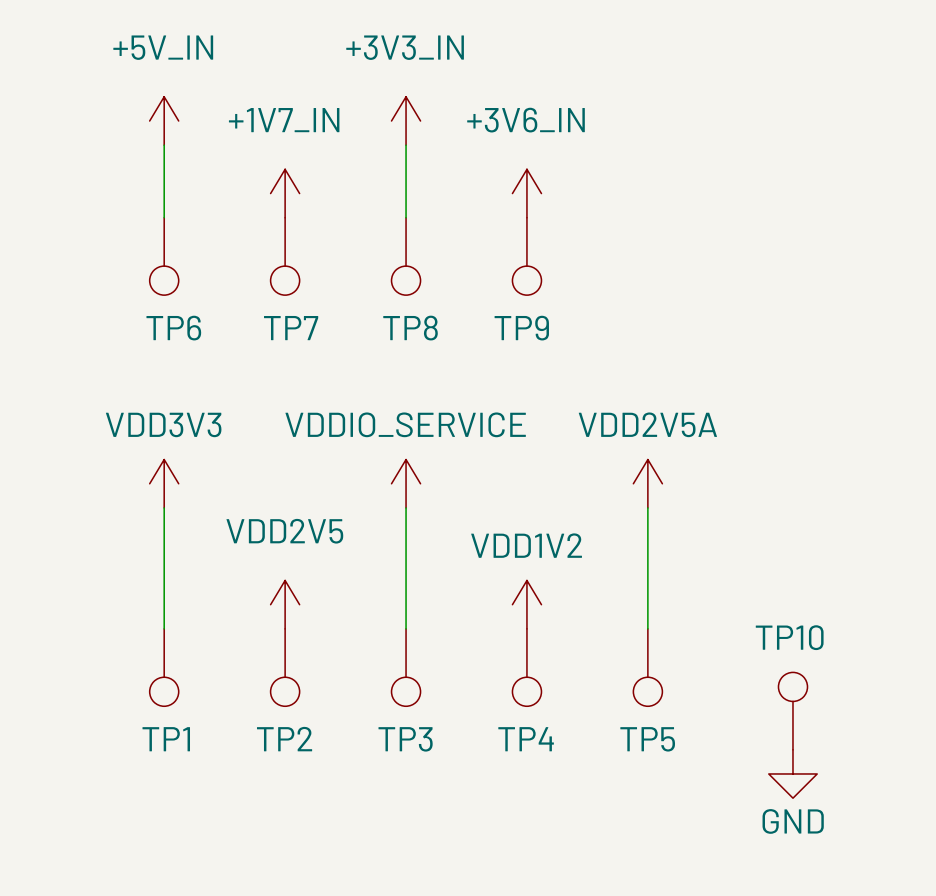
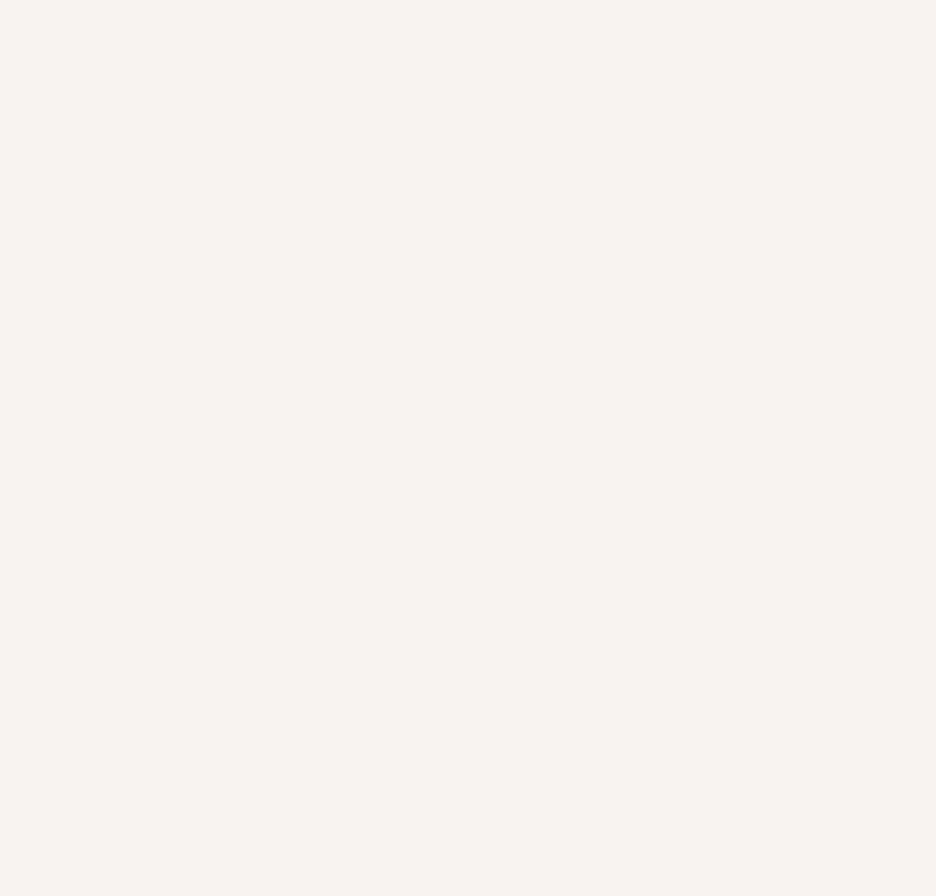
power symbol: +5V_IN (164, 121) -> none
power symbol: +3V3_IN (406, 121) -> none
wire: (164, 145) (164, 217) -> none
wire: (406, 145) (406, 217) -> none
power symbol: +1V7_IN (285, 193) -> none
power symbol: +3V6_IN (526, 193) -> none
TP6: (164, 256) -> none
TP7: (285, 256) -> none
TP8: (406, 256) -> none
TP9: (526, 256) -> none
power symbol: VDD3V3 (164, 483) -> none
power symbol: VDDIO_SERVICE (406, 483) -> none
power symbol: VDD2V5A (647, 483) -> none
wire: (164, 507) (164, 628) -> none
wire: (406, 507) (406, 628) -> none
wire: (647, 507) (647, 628) -> none
power symbol: VDD2V5 (285, 604) -> none
power symbol: VDD1V2 (526, 604) -> none
TP1: (164, 667) -> none
TP2: (285, 667) -> none
TP3: (406, 667) -> none
TP4: (526, 667) -> none
TP5: (647, 667) -> none
TP10: (792, 711) -> none
power symbol: GND (792, 773) -> none

